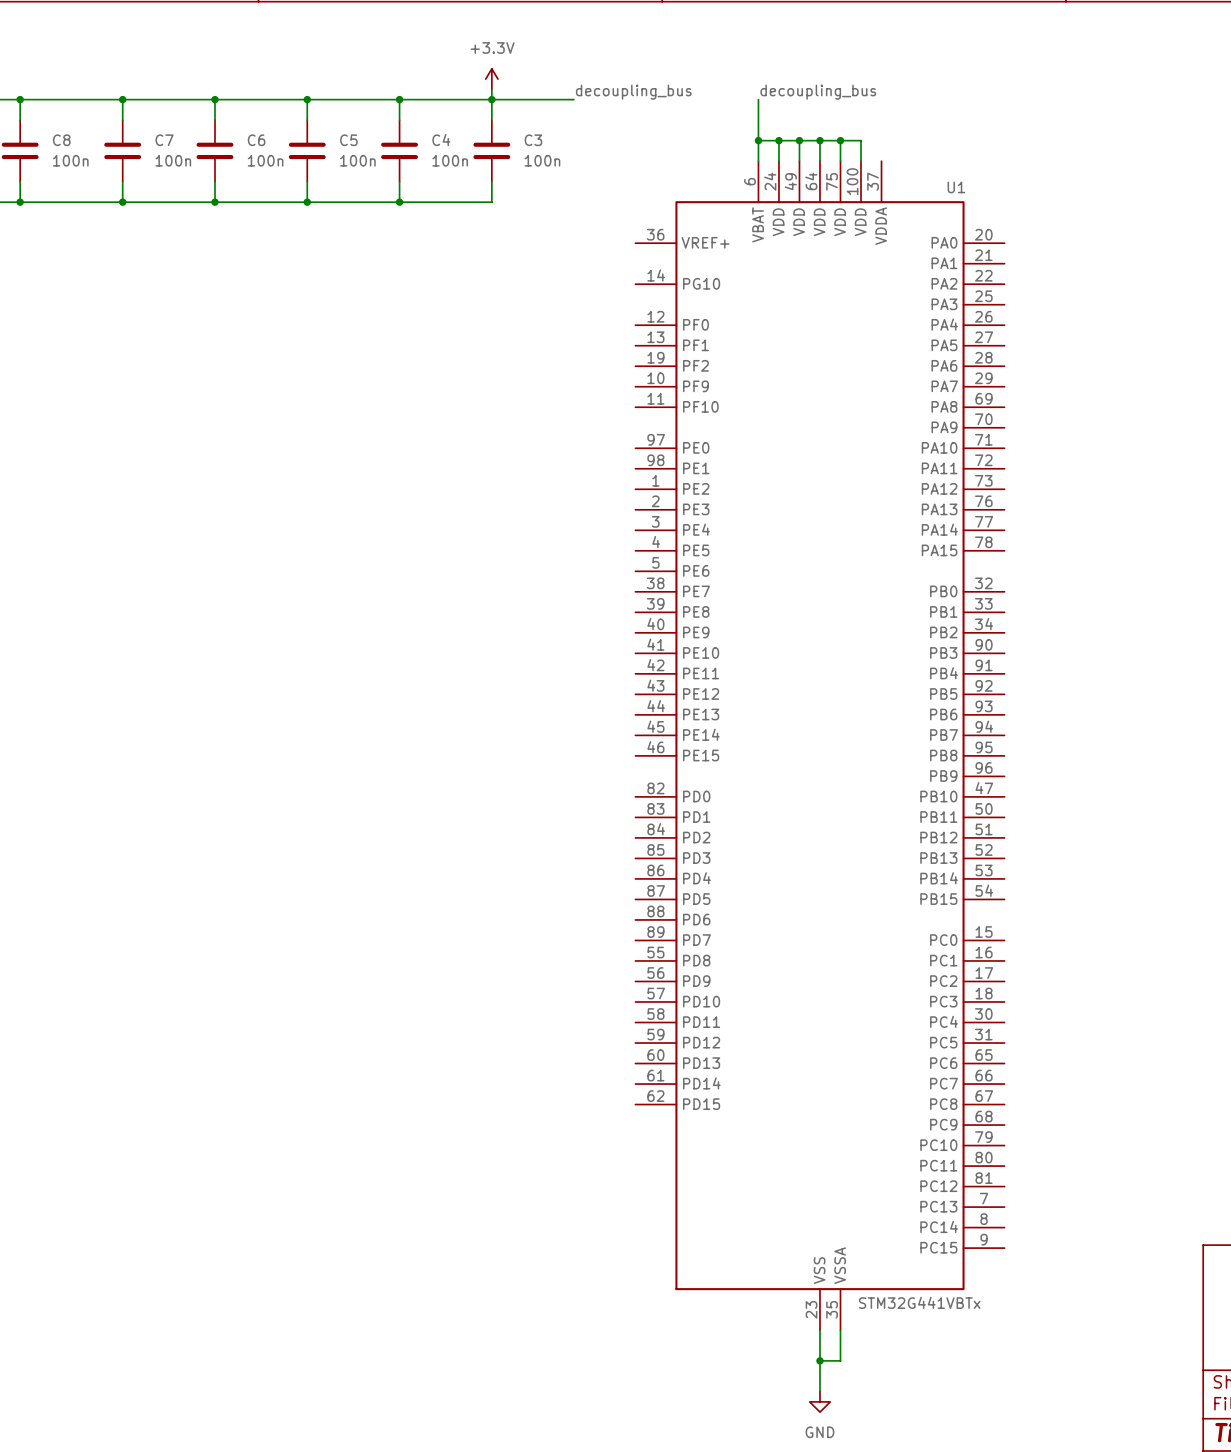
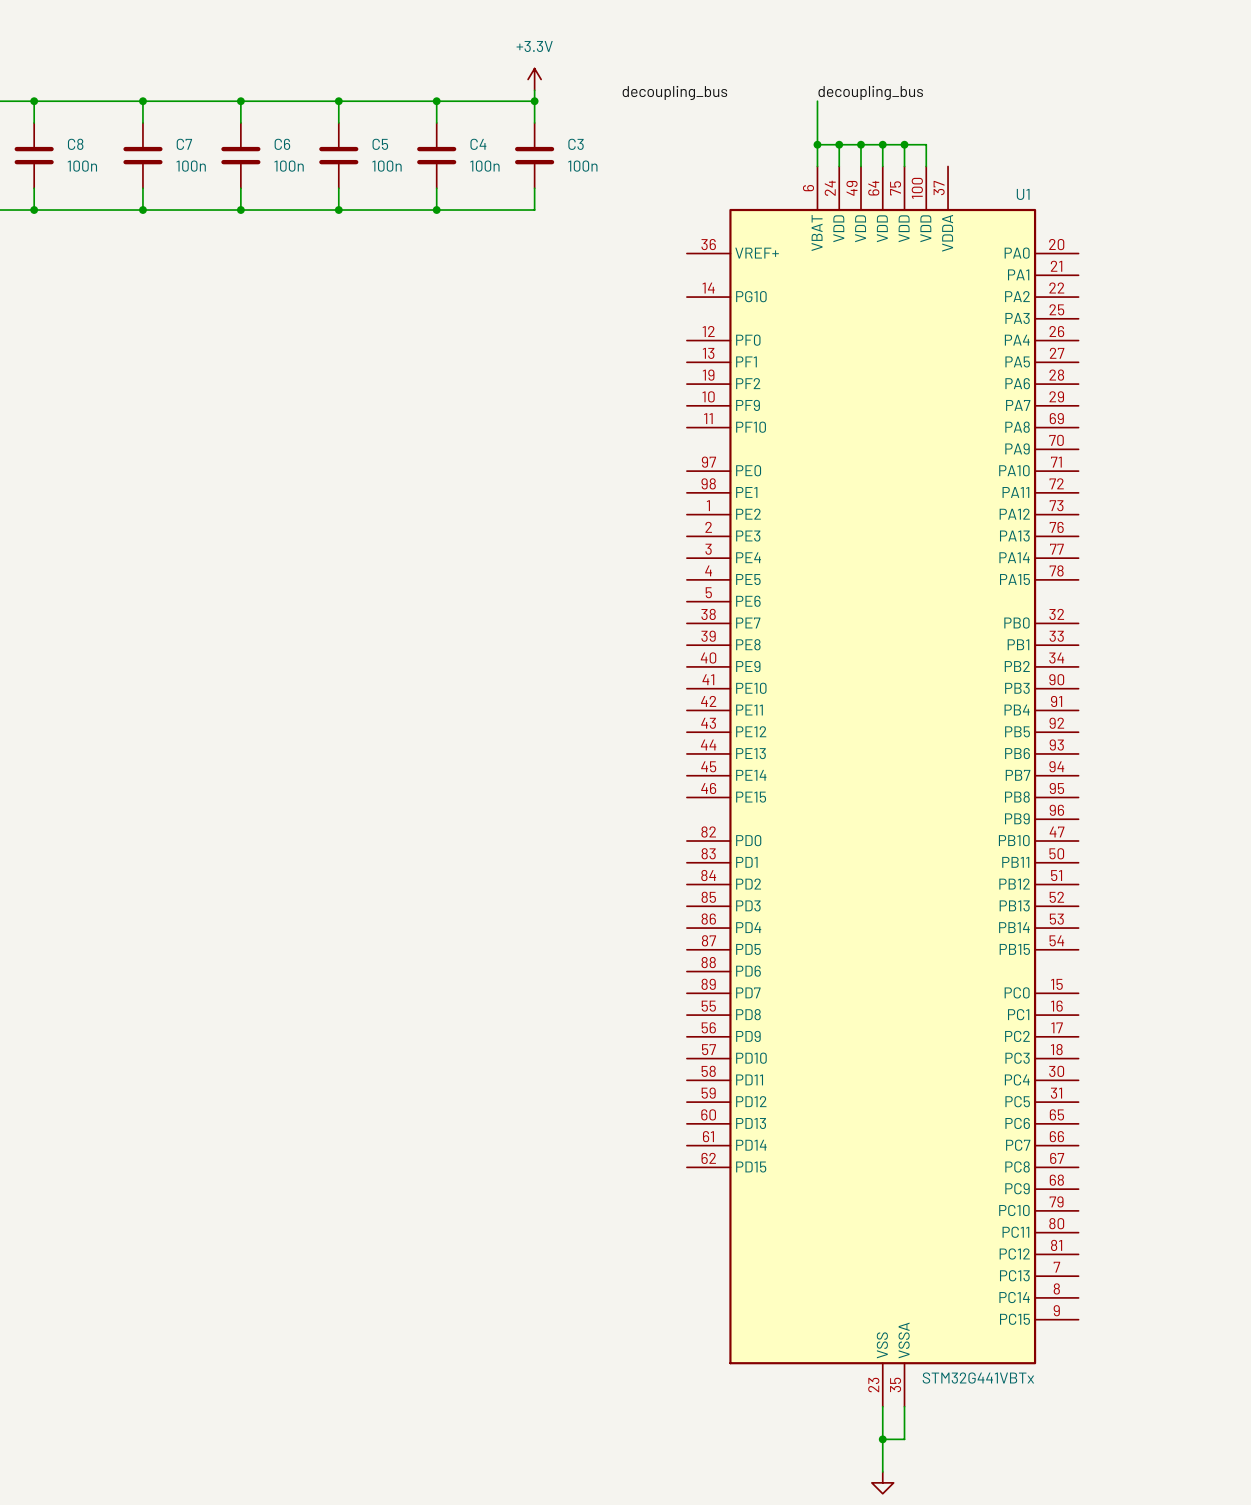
wire: (491, 99) (573, 99) -> none

